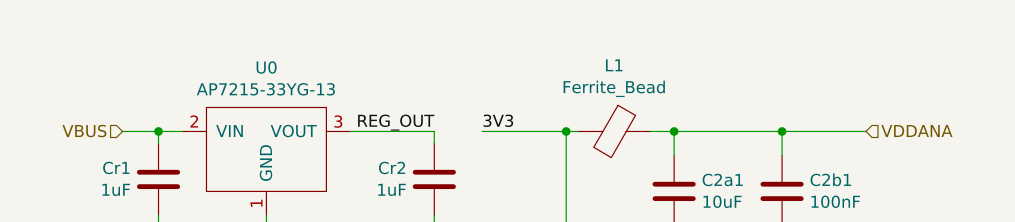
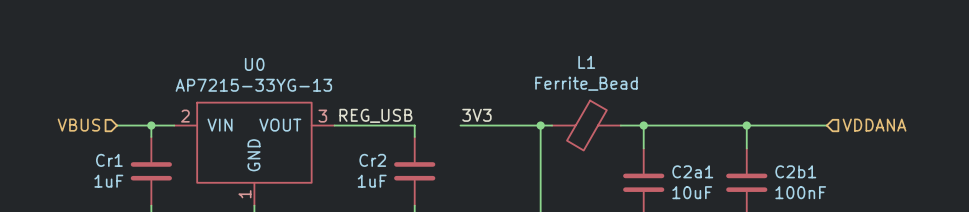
label: REG_OUT (396, 122) -> REG_USB (375, 115)

